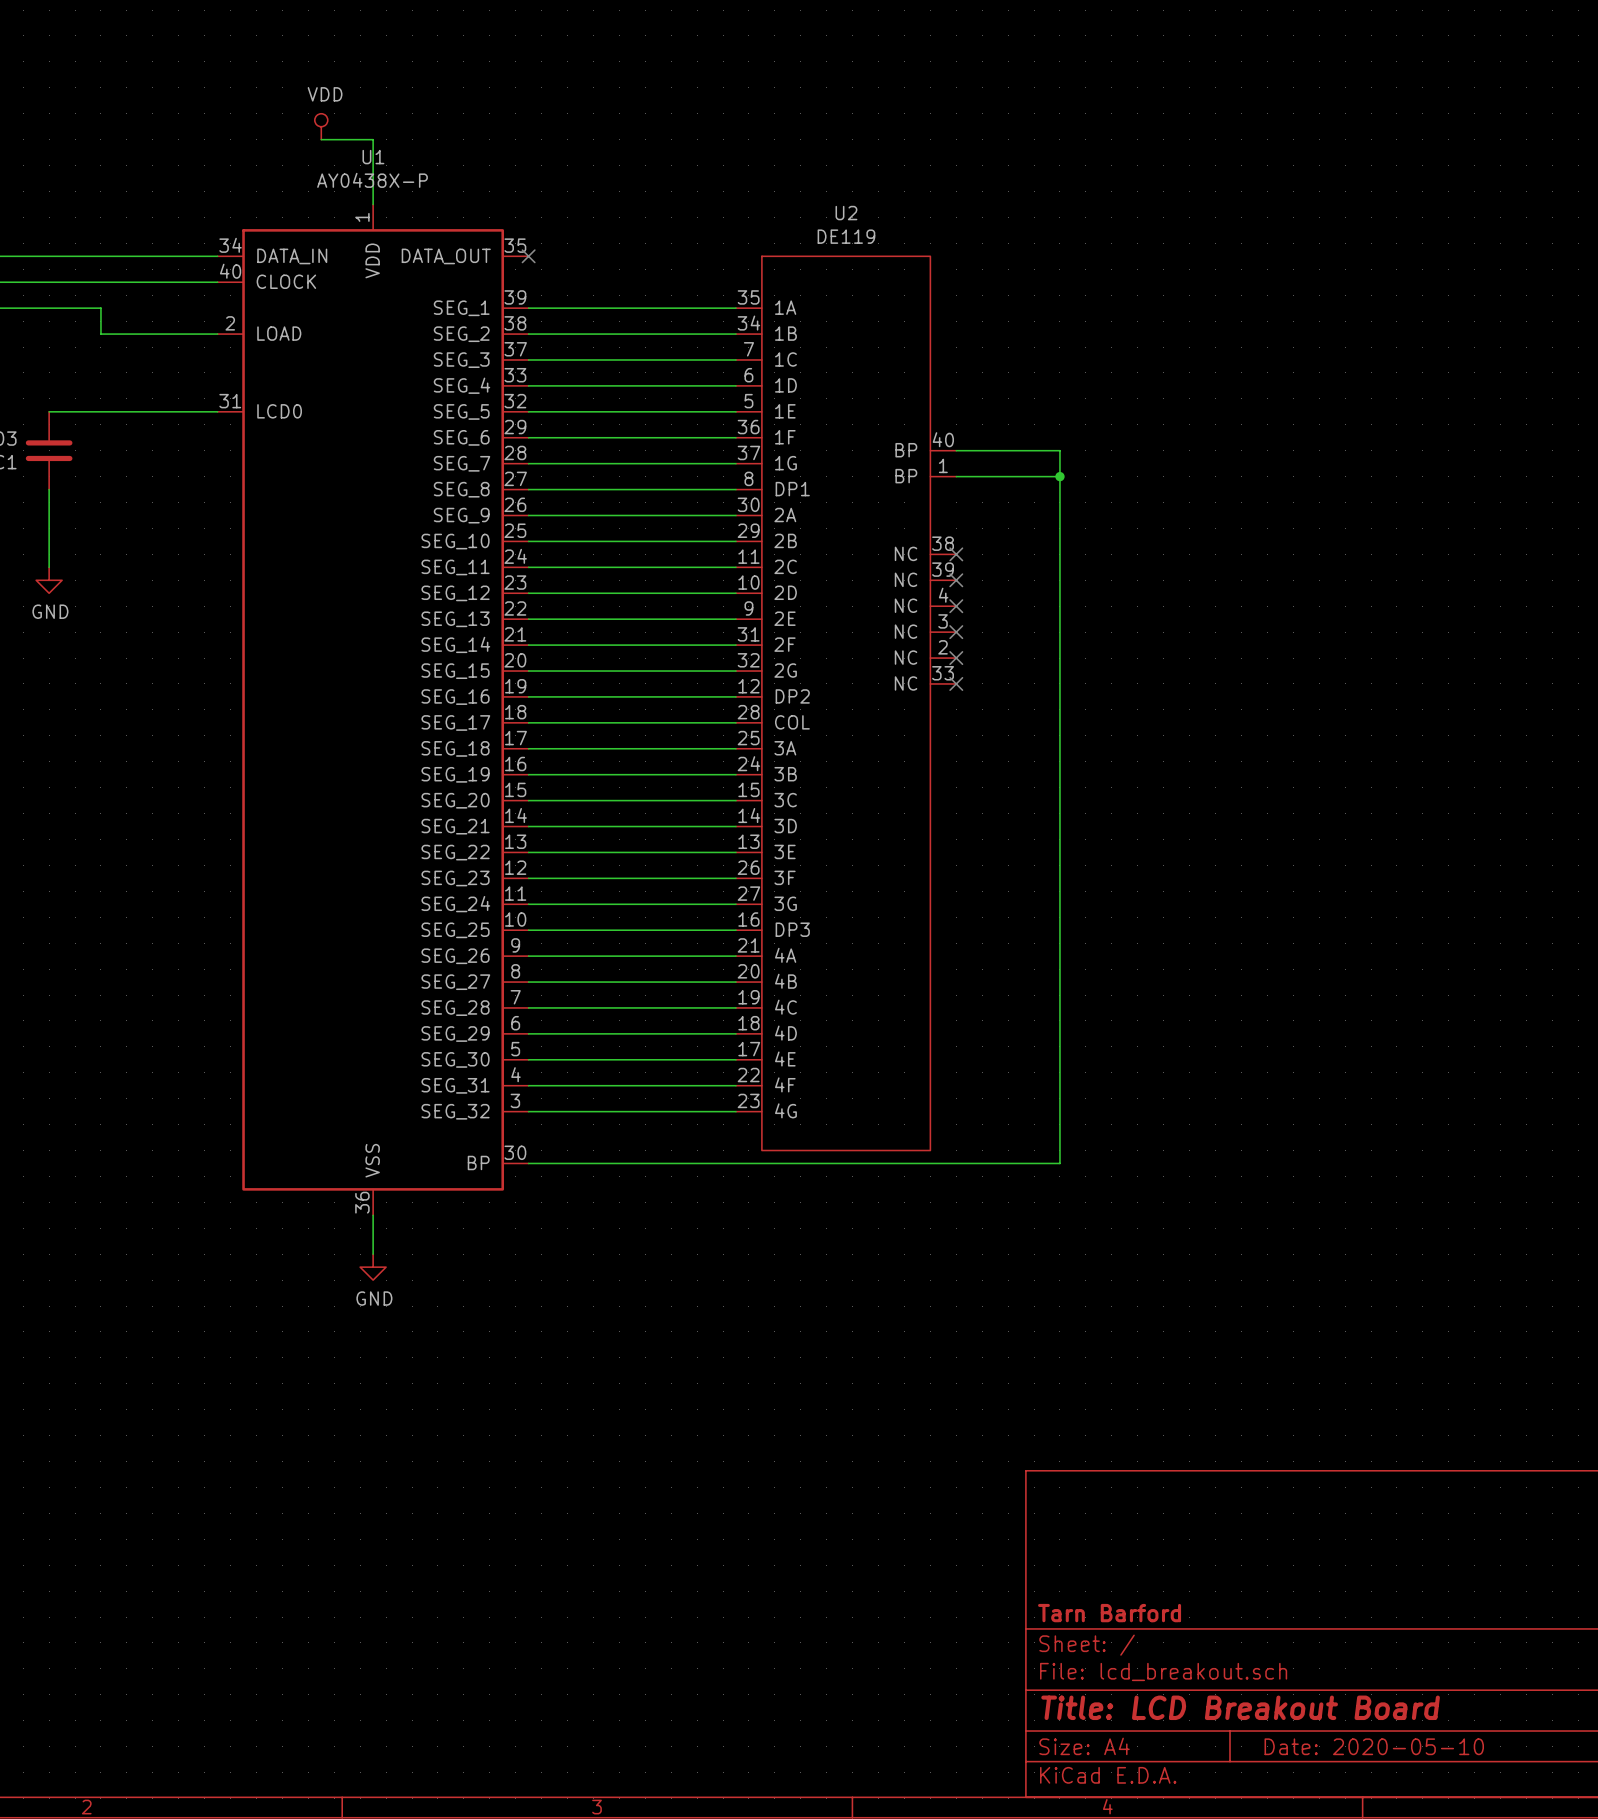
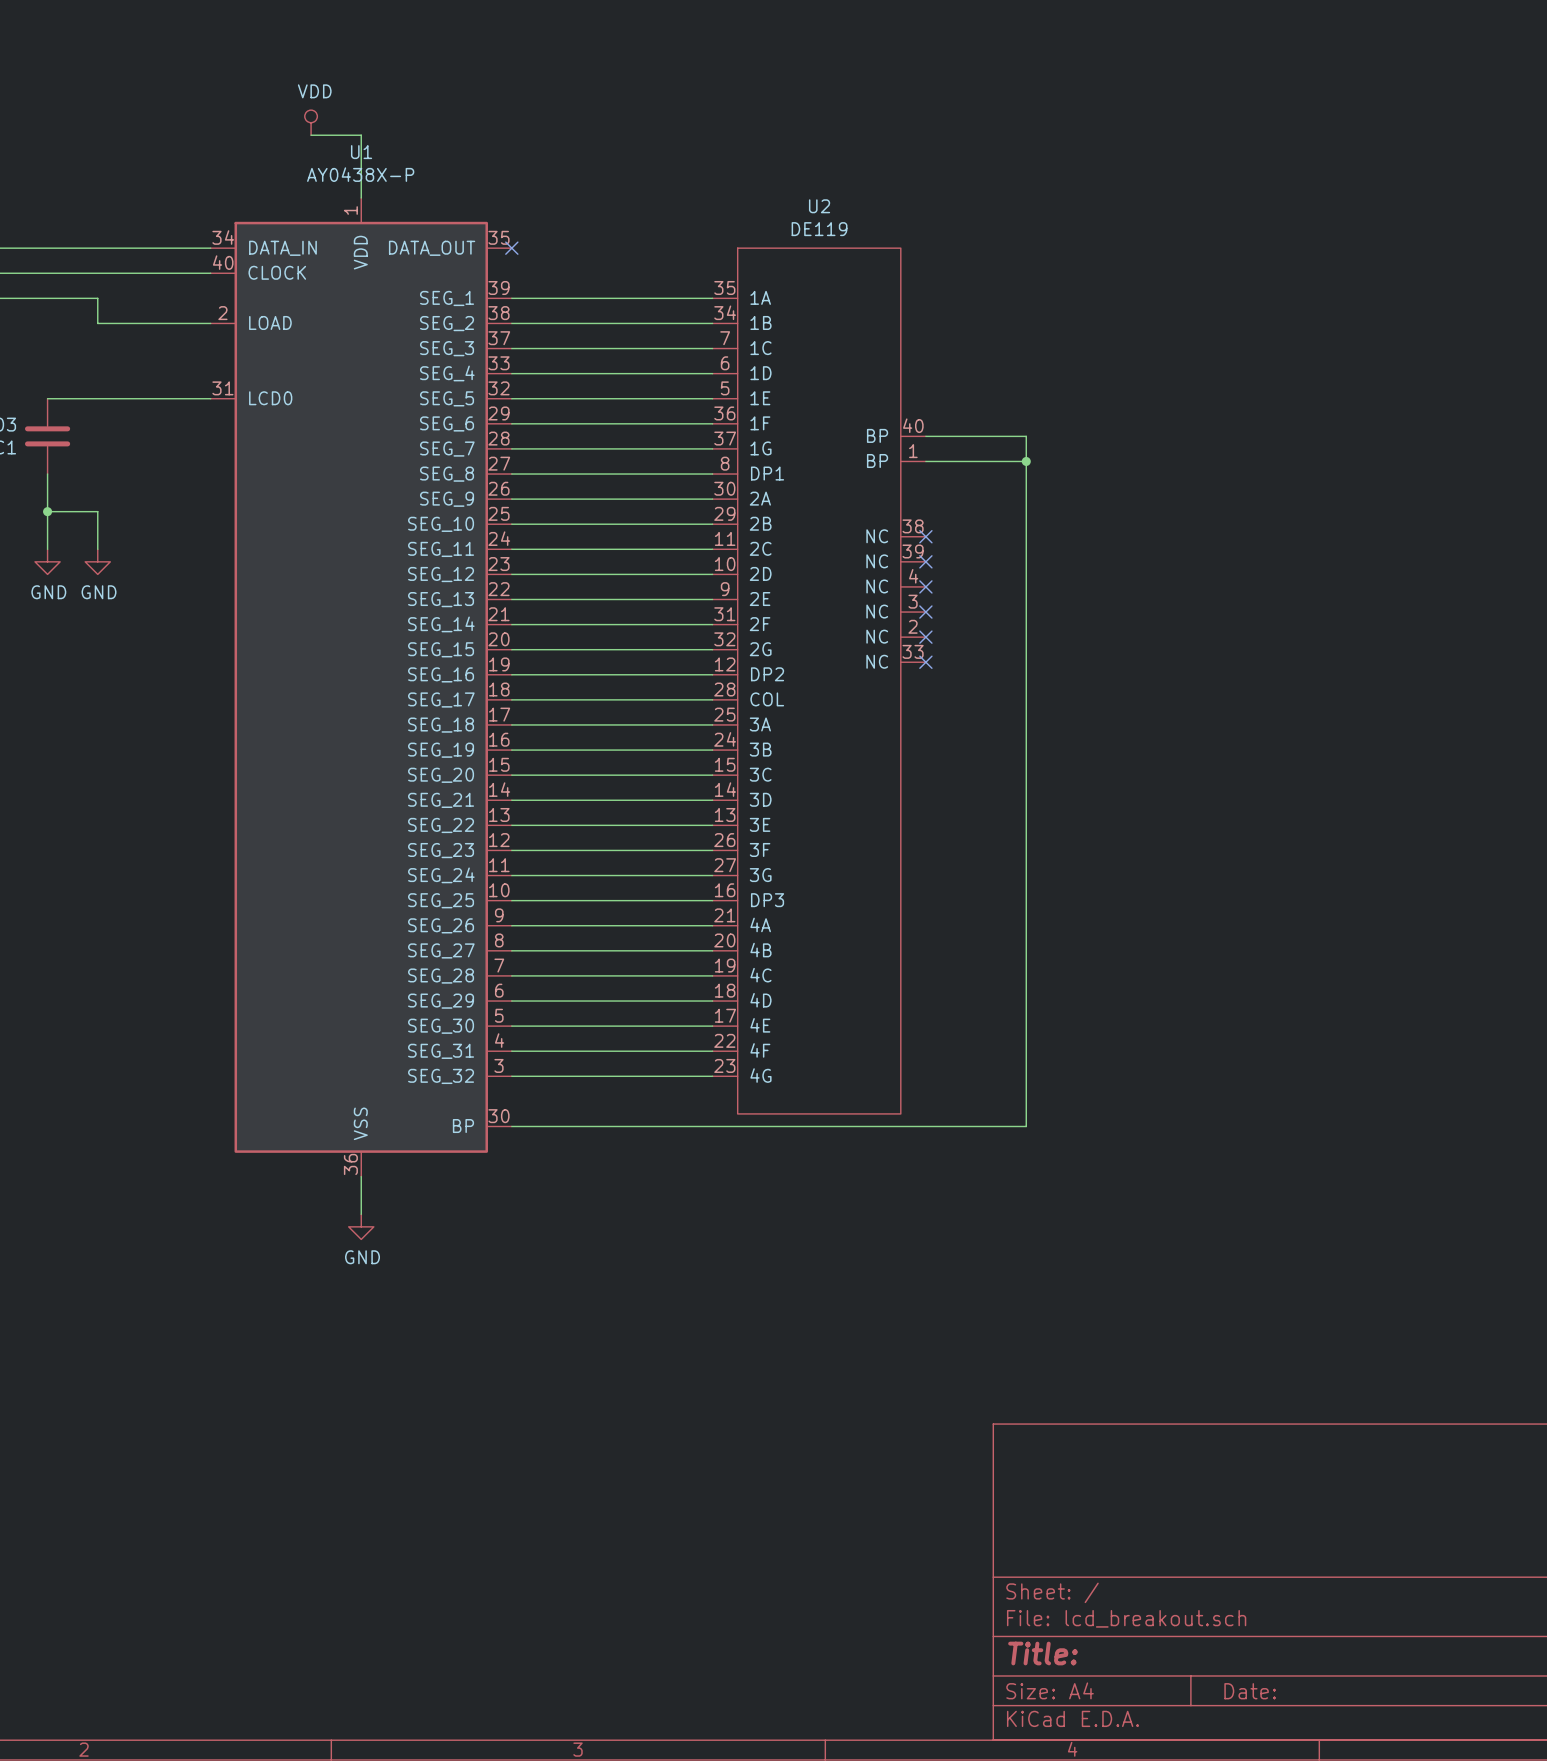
wire: none -> (47, 511) (97, 511) (97, 549)
junction: none -> (47, 511)
power symbol: none -> GND (97, 561)
title block: Tarn Barford (1109, 1613) -> none
title block: Title: LCD Breakout Board (1240, 1707) -> Title: (1043, 1653)
title block: Date: 2020-05-10 (1374, 1746) -> Date: (1250, 1691)

